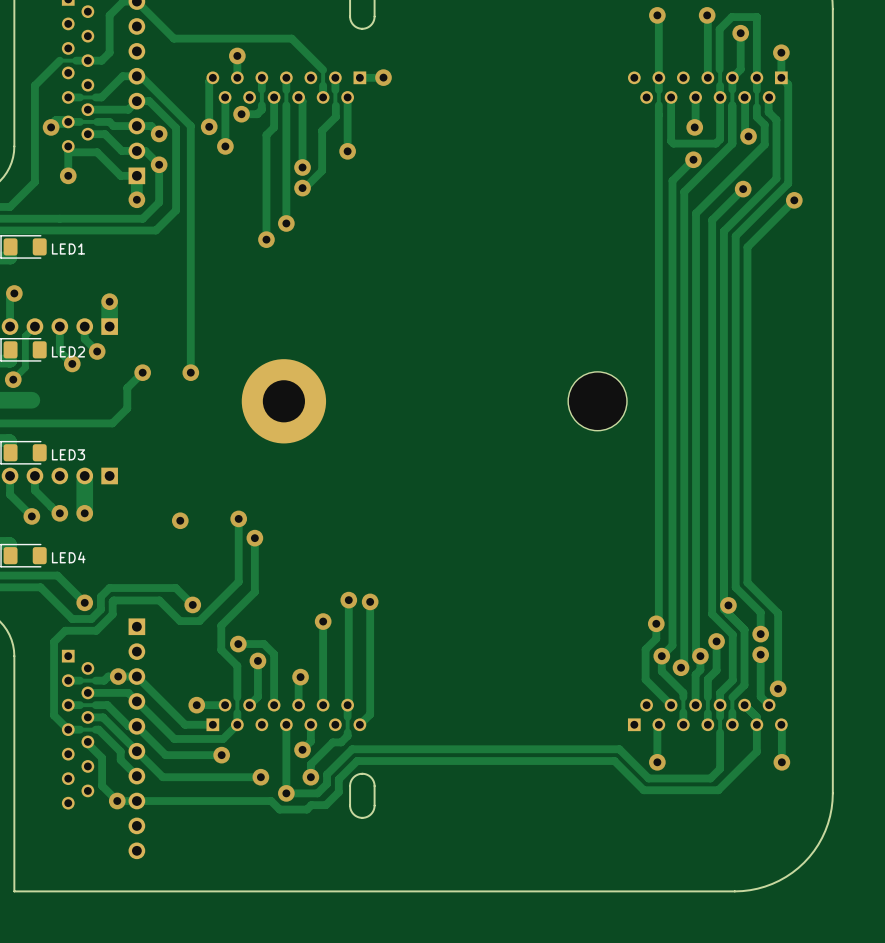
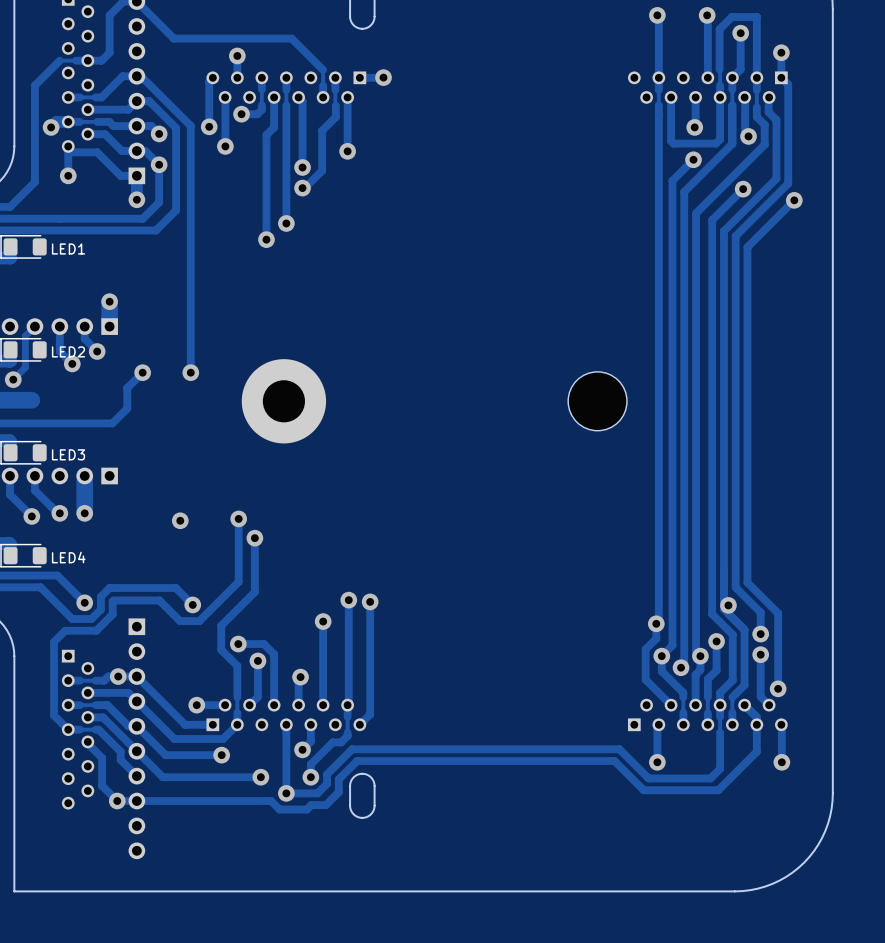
track: (14, 293) (10, 297) (10, 326) -> none
via: (14, 293) -> none

